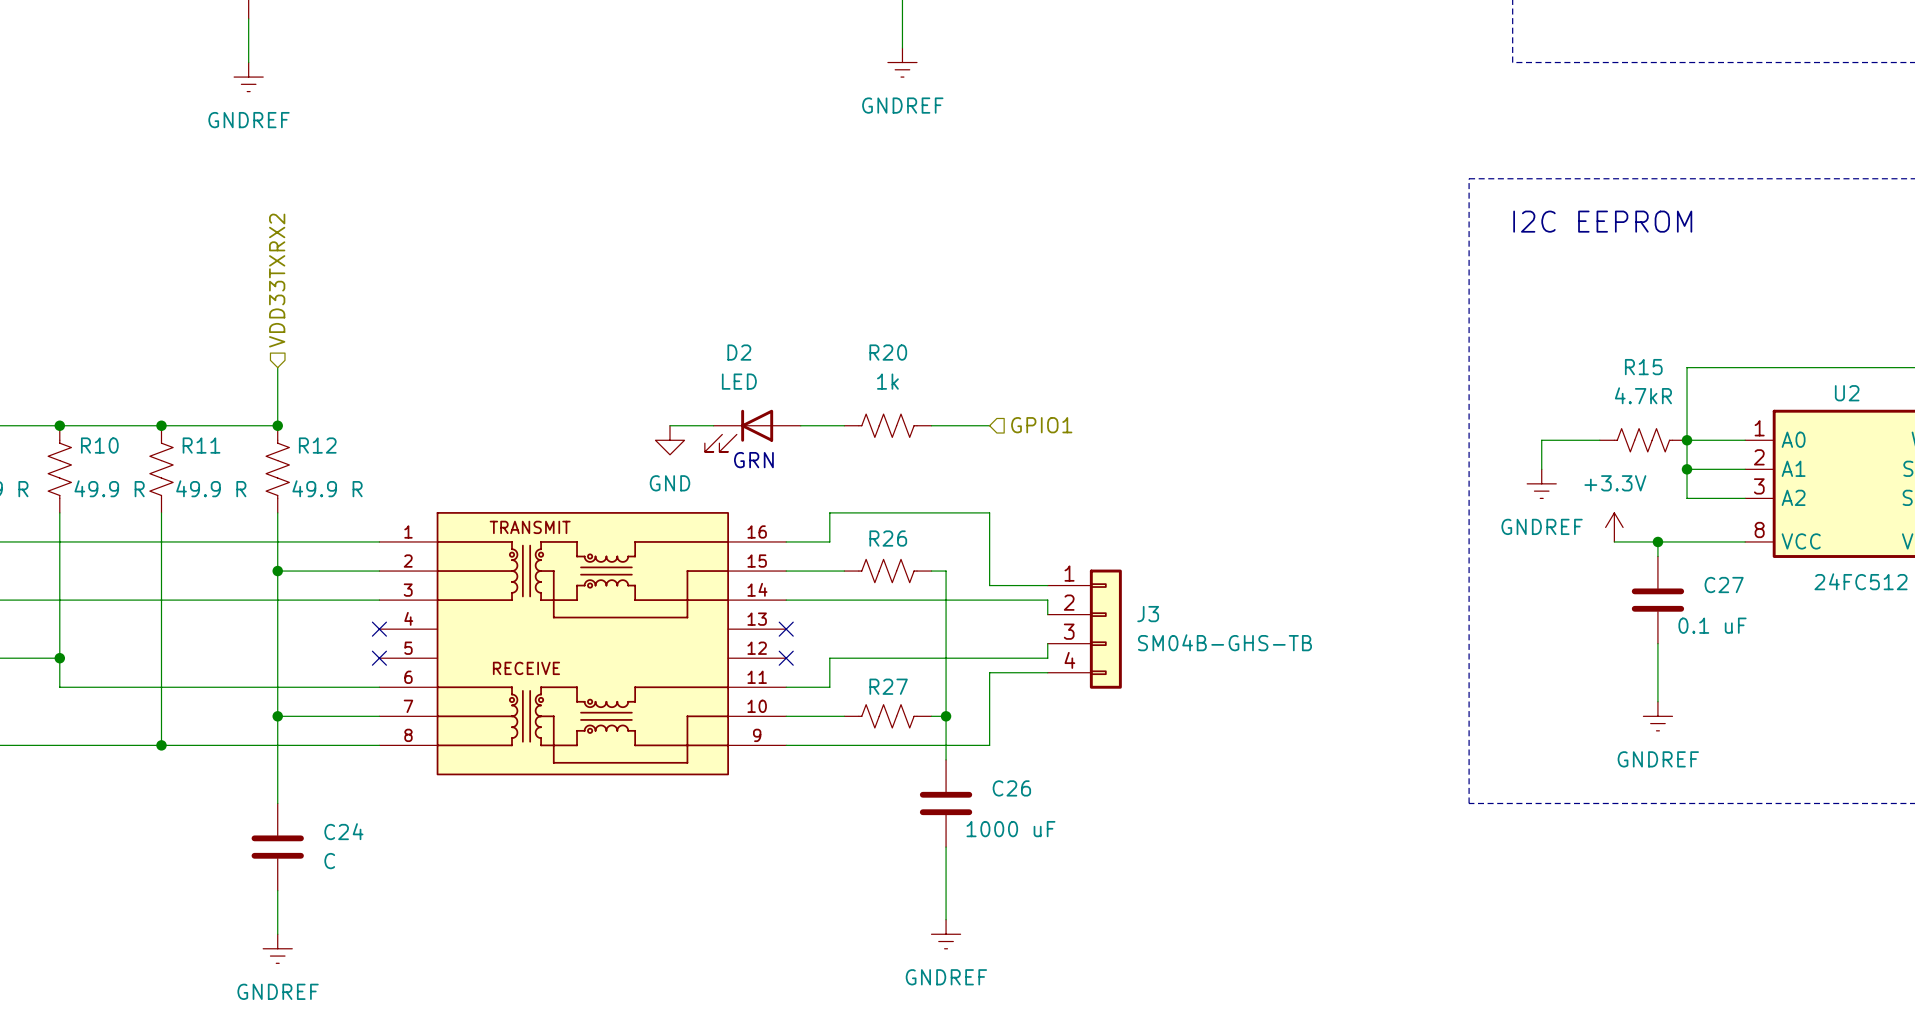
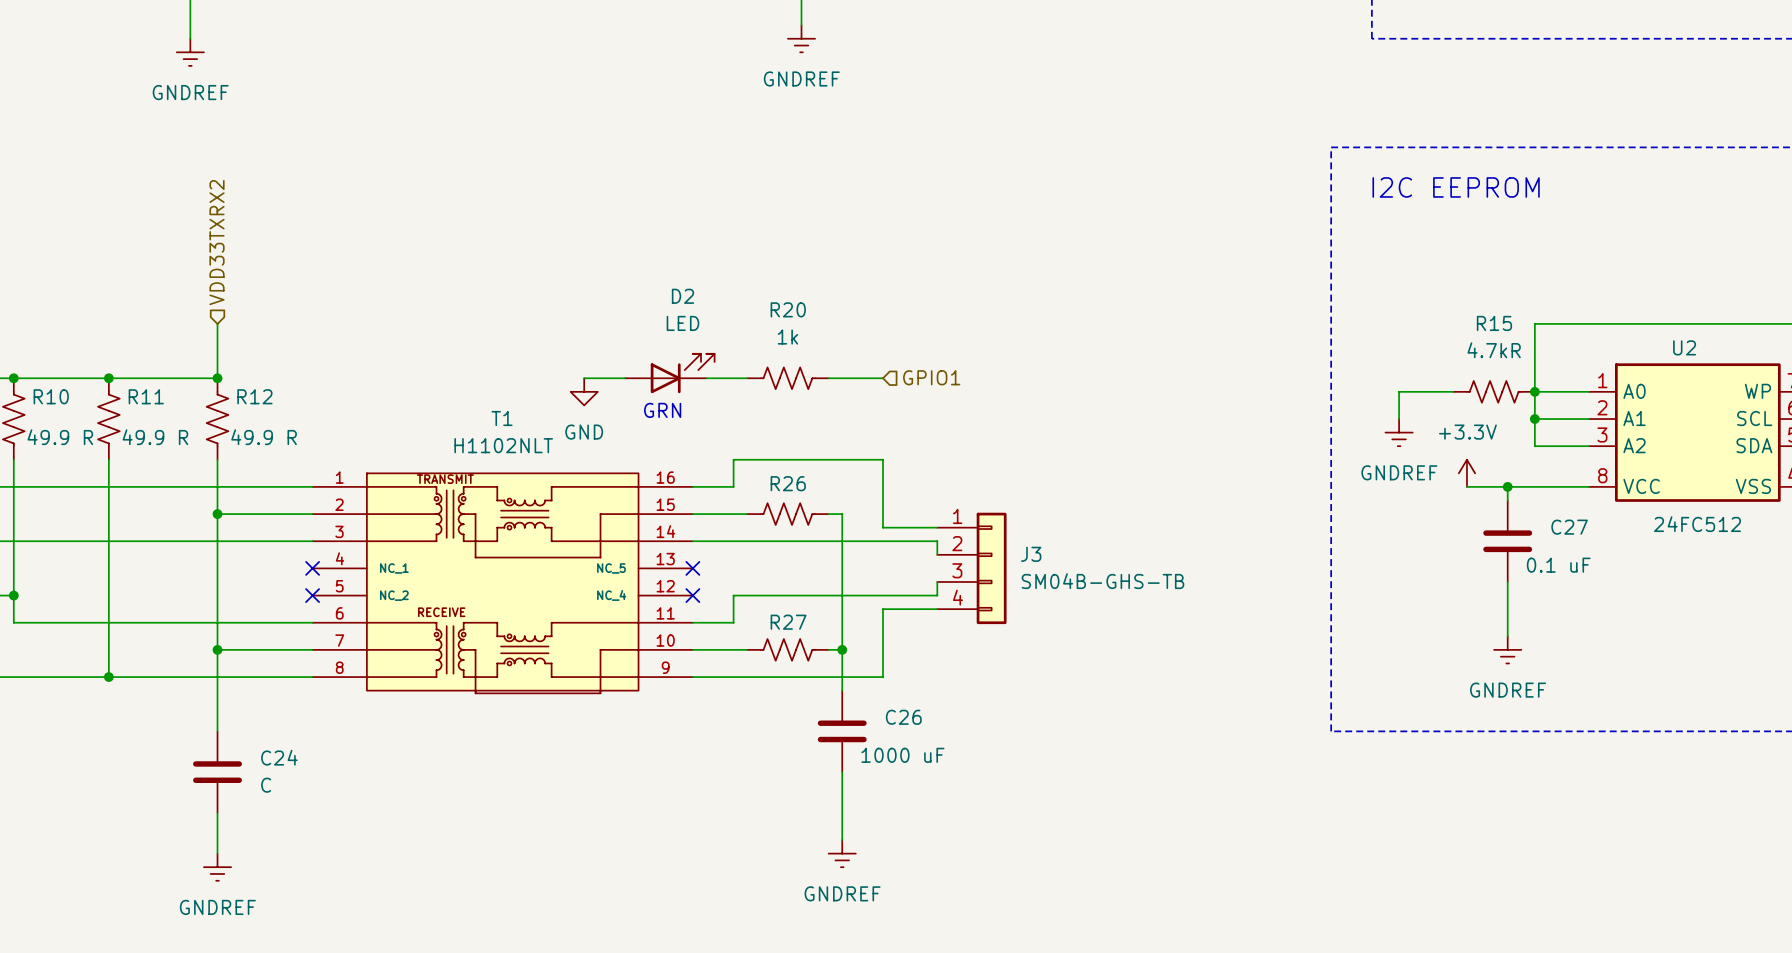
D2 name position: D2 (739, 352) -> D2 (682, 296)
D2 value position: LED (739, 381) -> LED (682, 323)
D2 rotation: 0° (739, 430) -> 180° (682, 373)
part: (582, 643) -> none
T1: none -> H1102NLT (502, 583)

